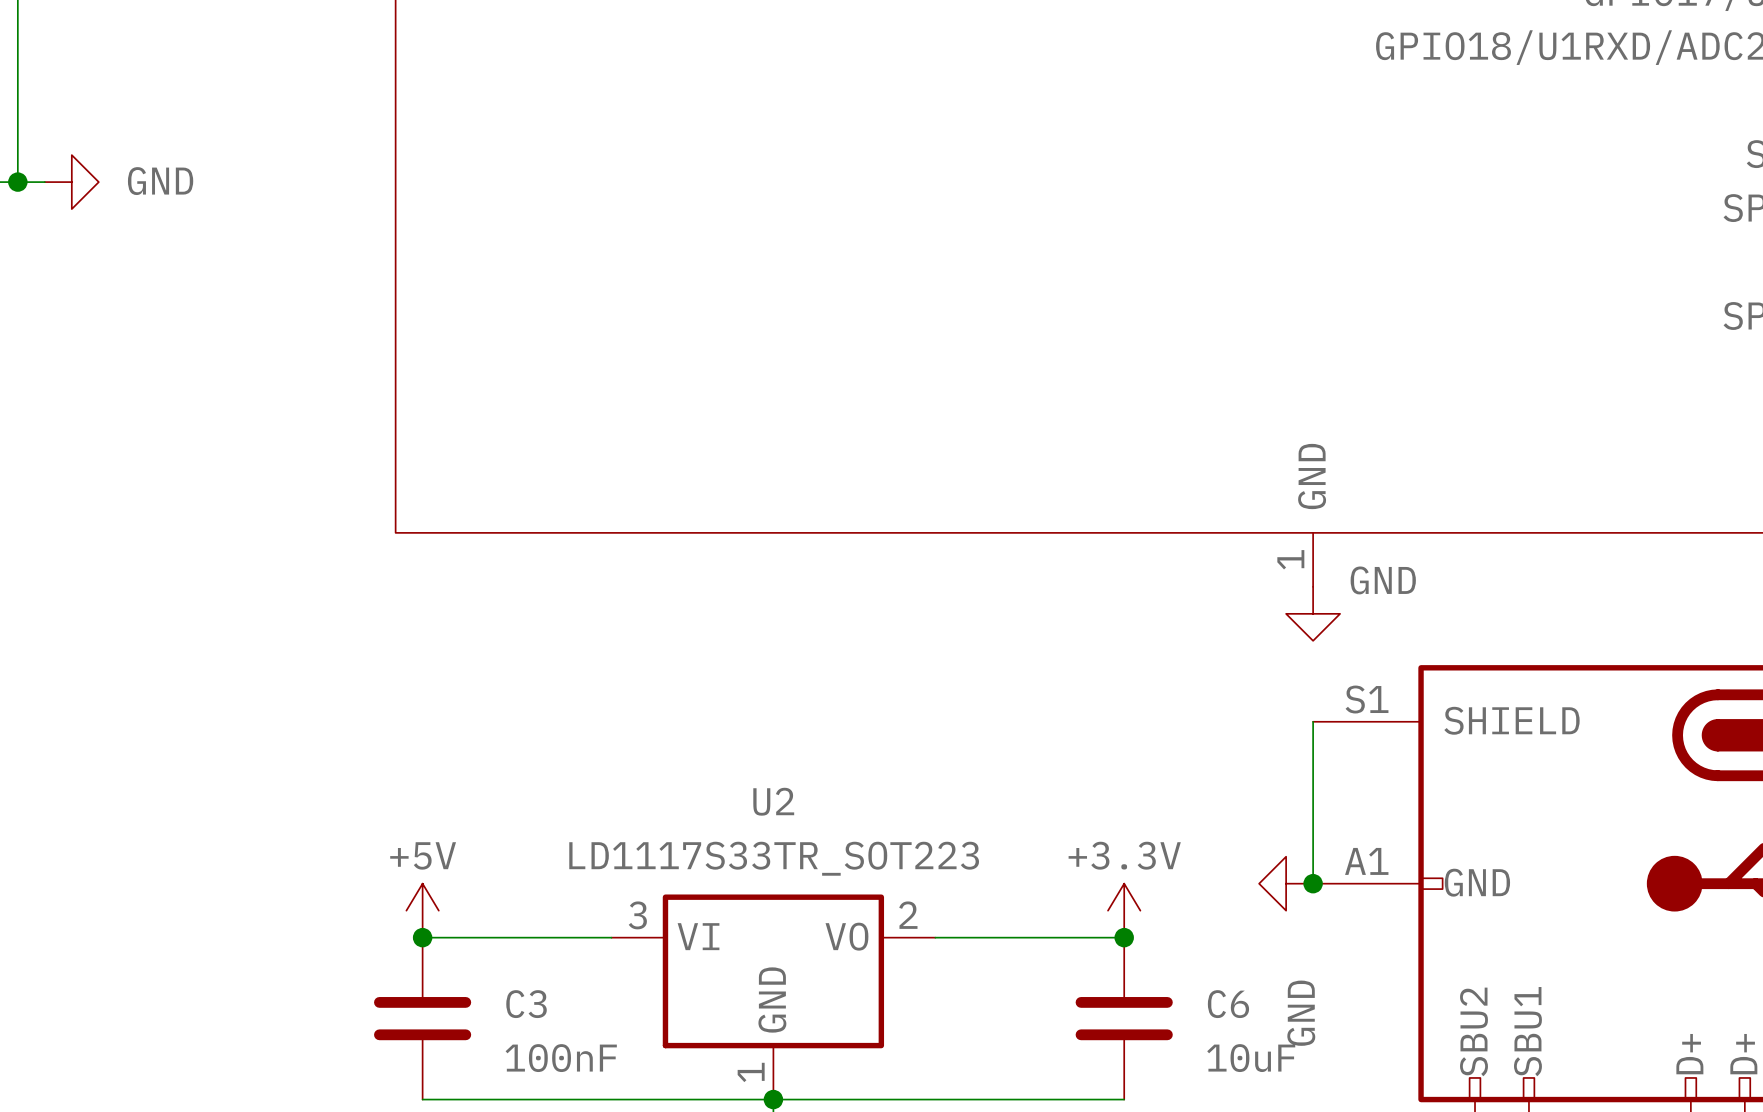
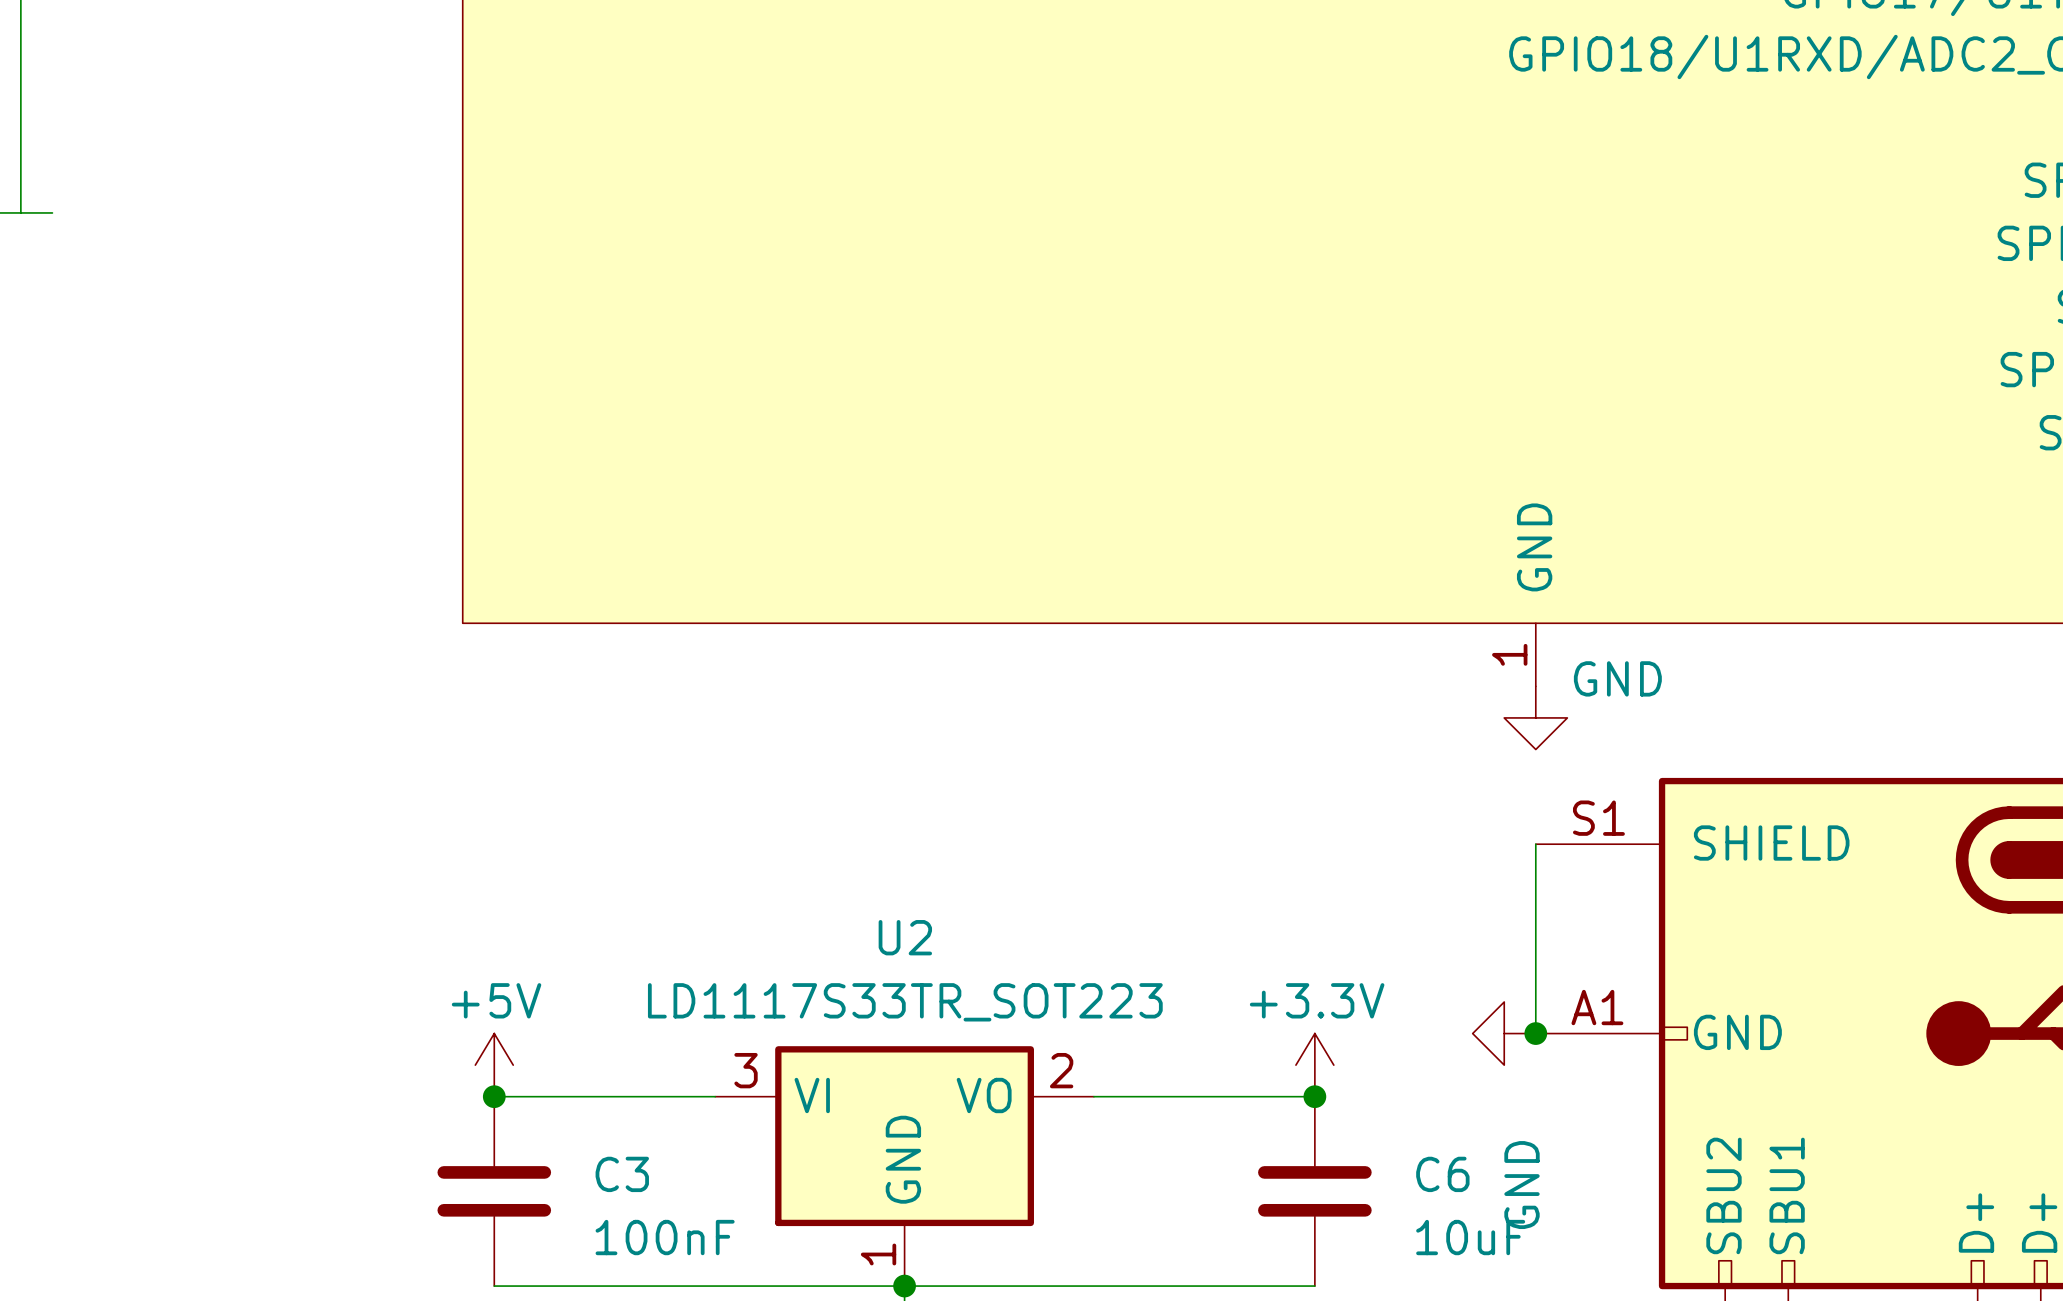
junction: (17, 182) -> none
power symbol: GND (71, 182) -> none

